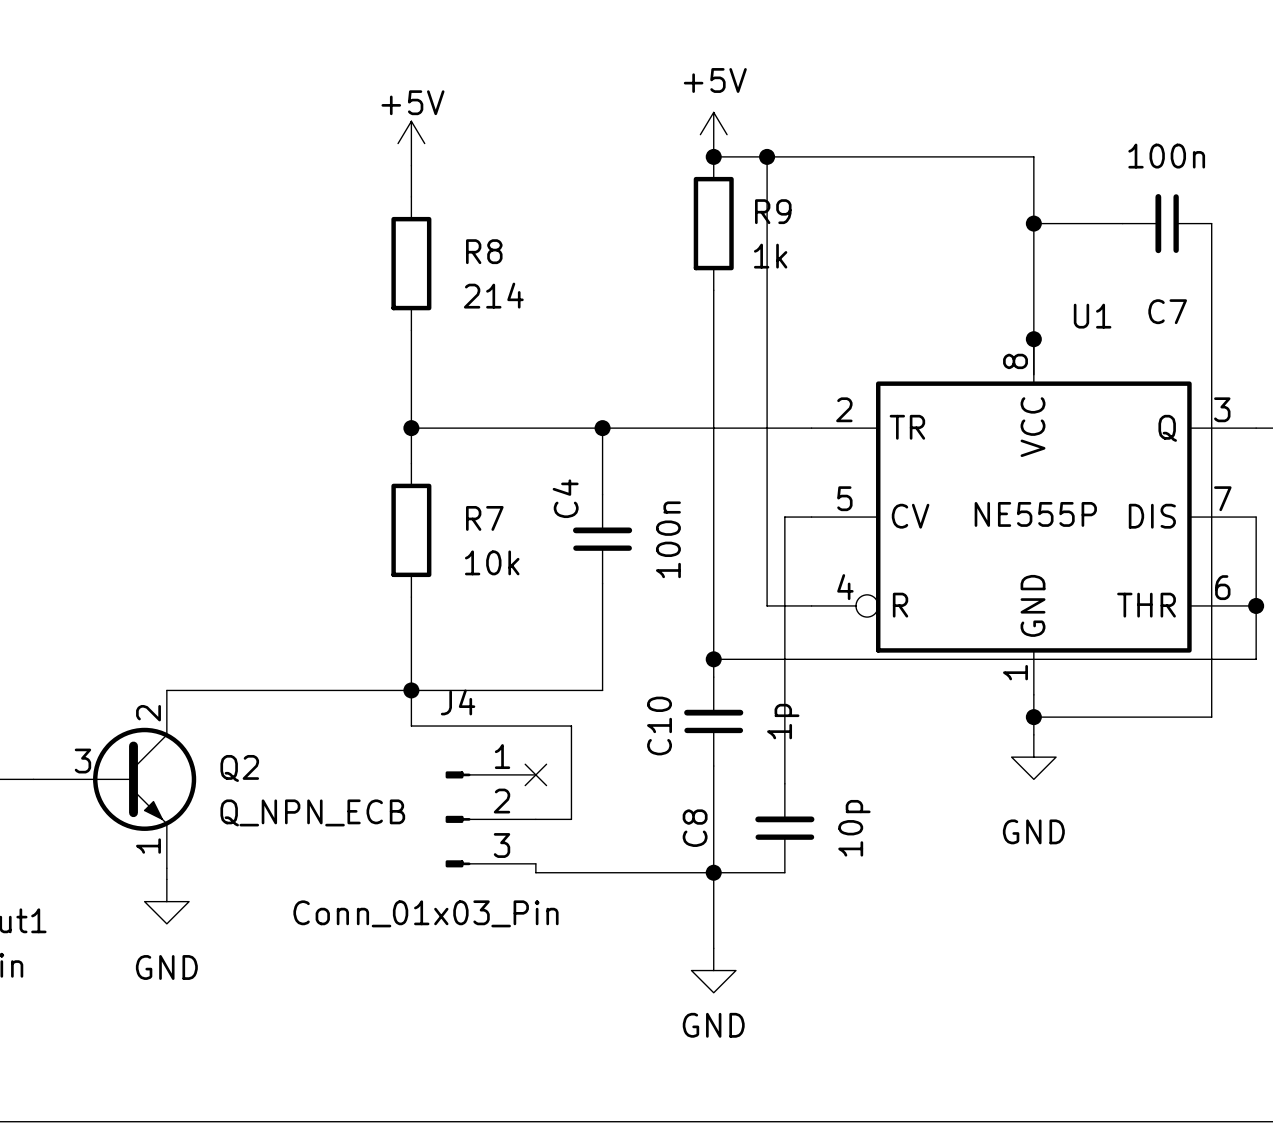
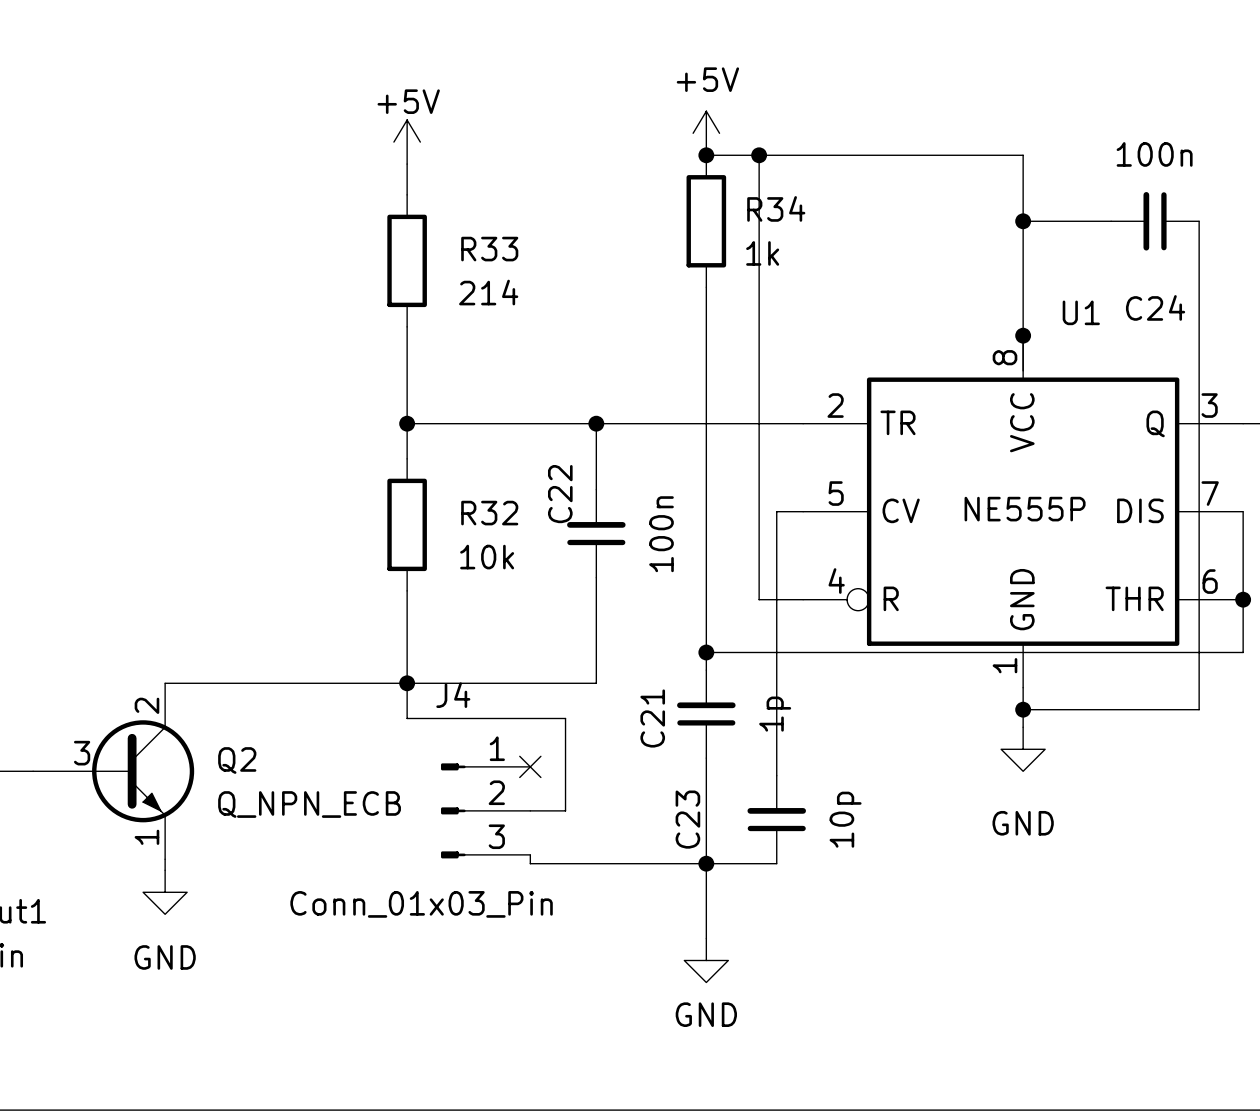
R9 name: R9 (773, 211) -> R34 (776, 208)
R8 name: R8 (484, 251) -> R33 (489, 249)
C7 name: C7 (1167, 311) -> C24 (1155, 307)
C4 name: C4 (565, 498) -> C22 (560, 494)
R7 name: R7 (484, 518) -> R32 (489, 513)
C10 name: C10 (659, 726) -> C21 (652, 718)
C8 name: C8 (695, 828) -> C23 (687, 819)

